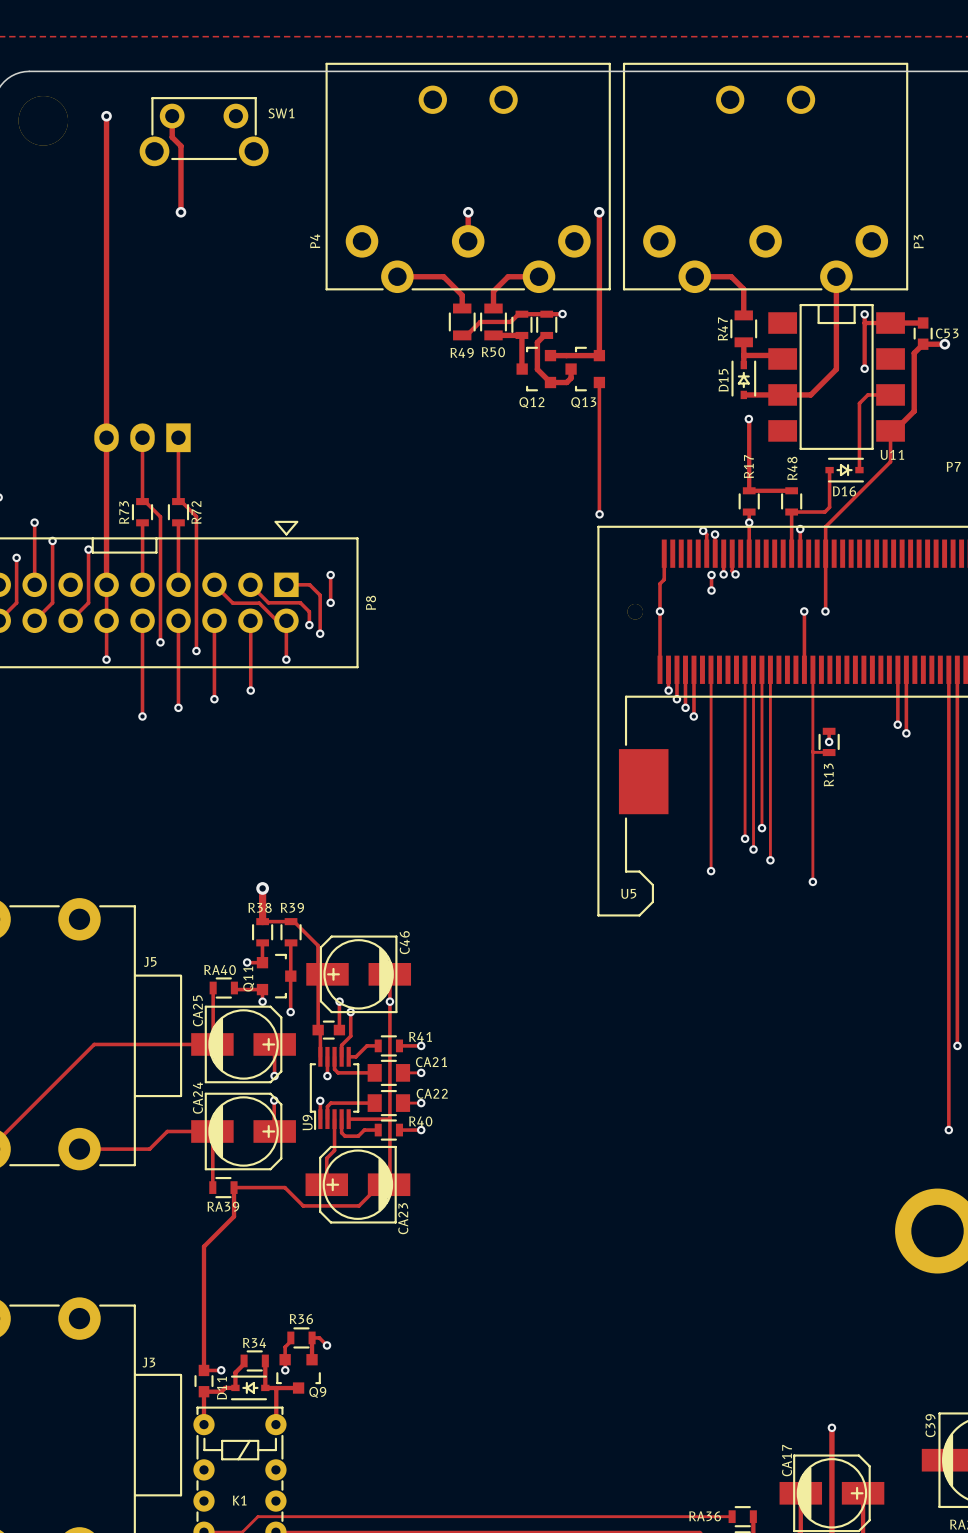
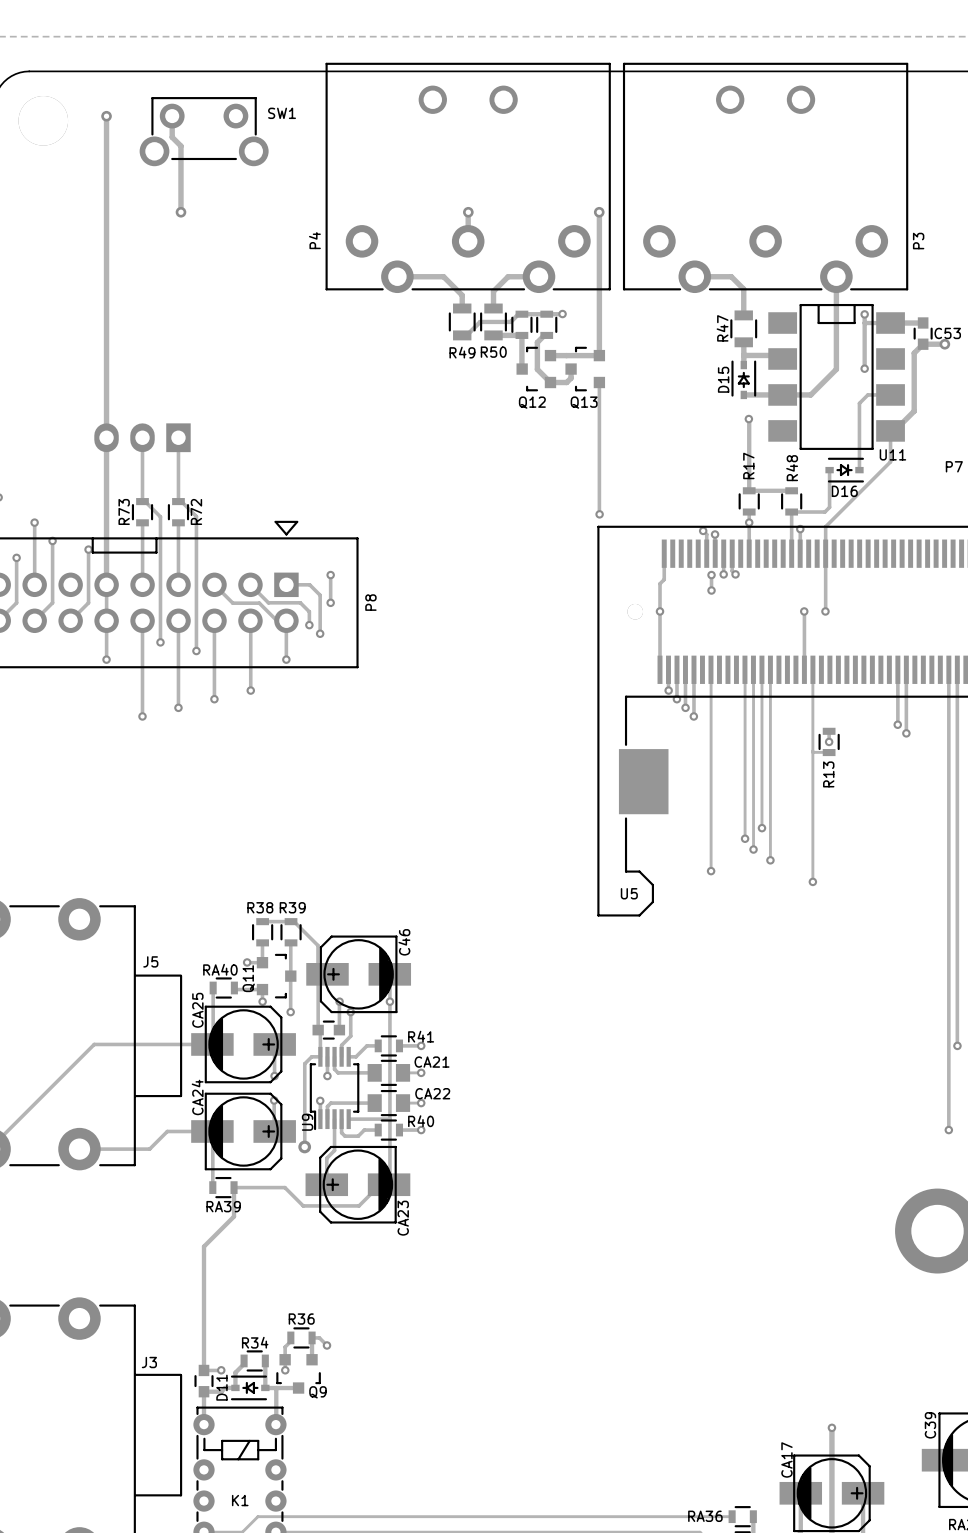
track: (262, 888) (262, 921) -> none
via: (262, 888) -> none
track: none -> (320, 1056) (311, 1056) (304, 1063) (304, 1146)
via: none -> (304, 1146)

